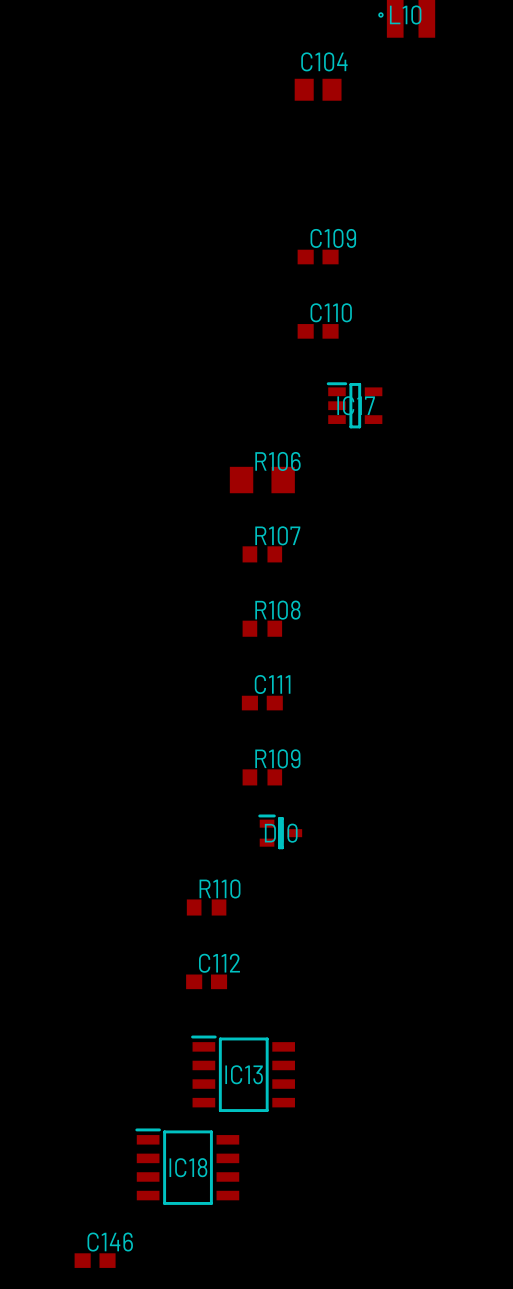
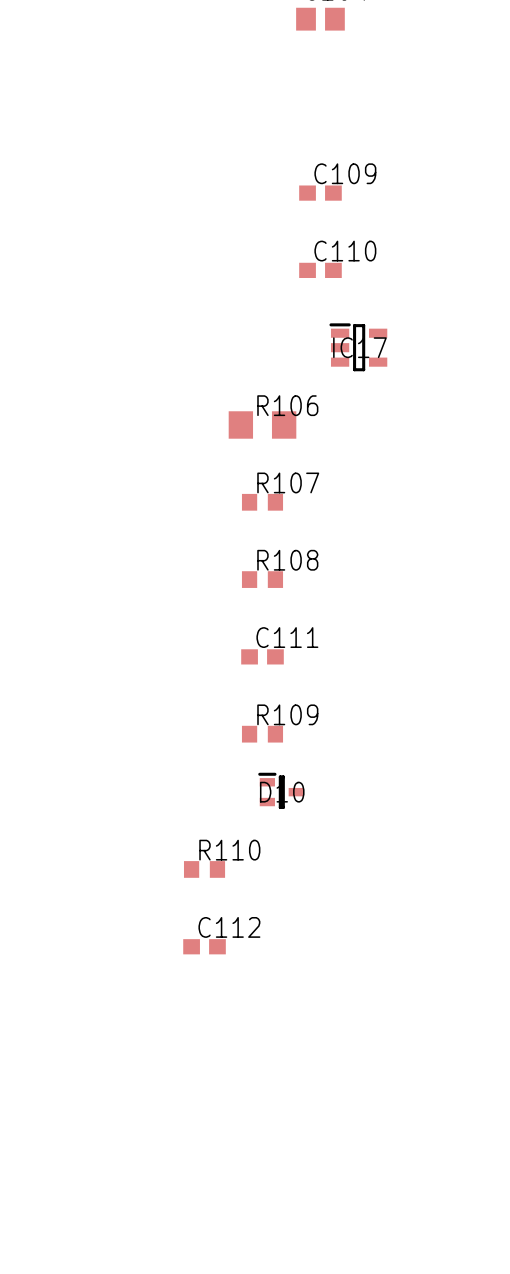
IC13: (243, 1073) -> none
IC18: (187, 1166) -> none
C146: (95, 1260) -> none

